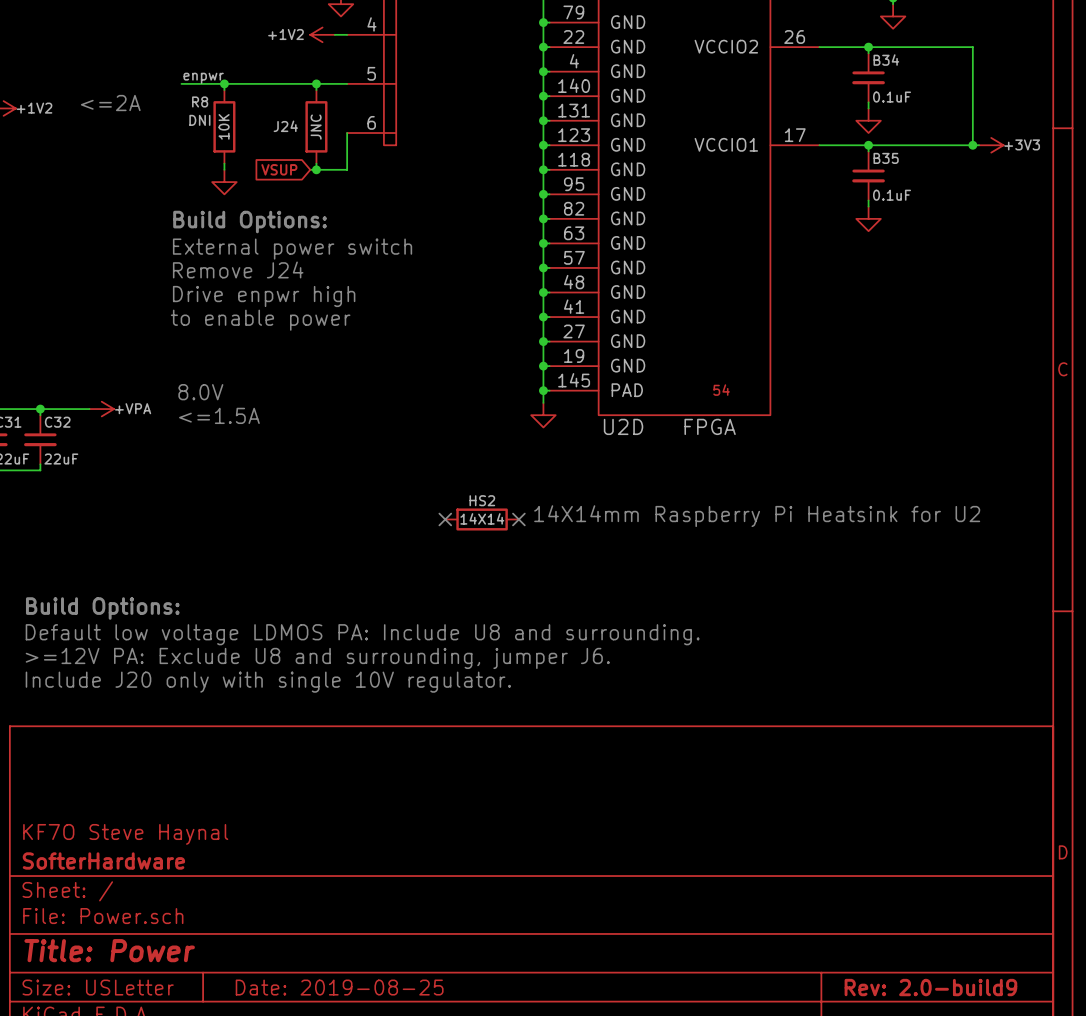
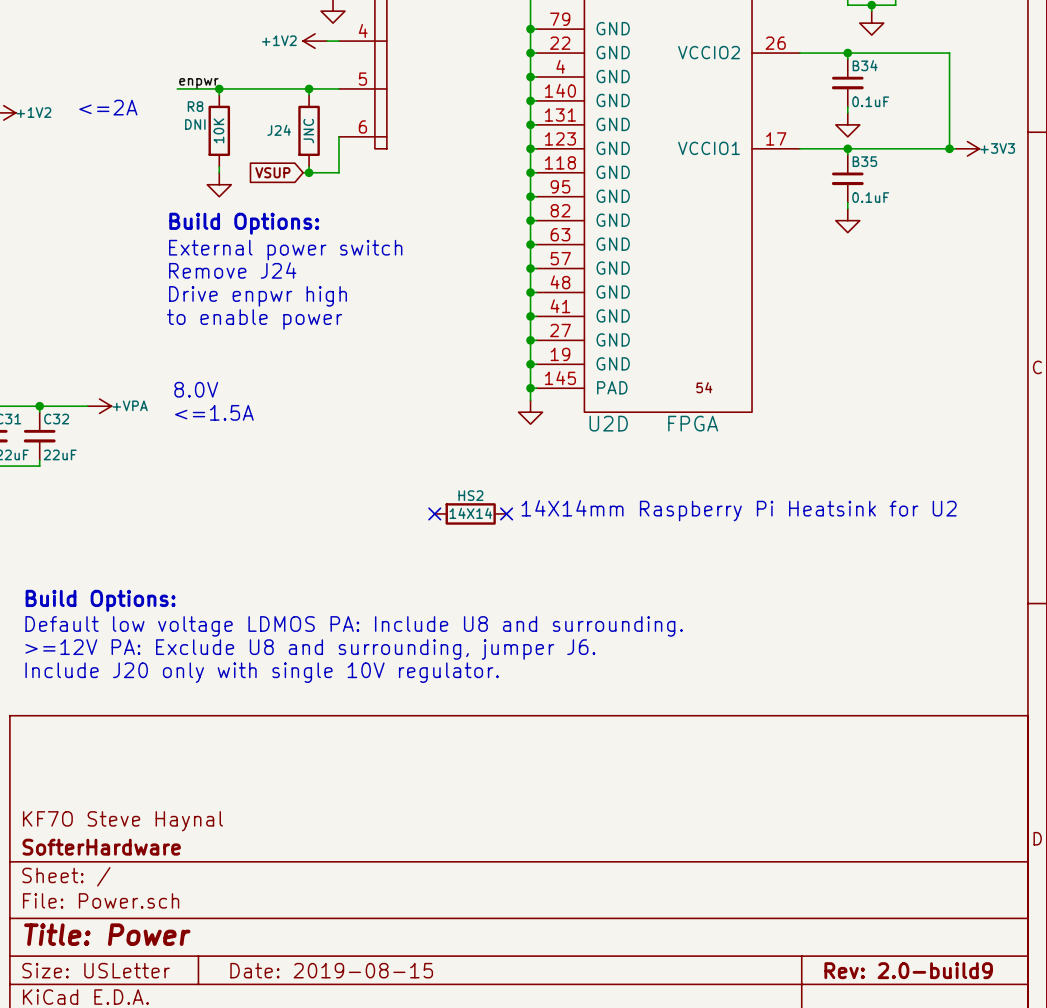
title block: Date: 2019-08-25 (339, 987) -> Date: 2019-08-15 (331, 970)

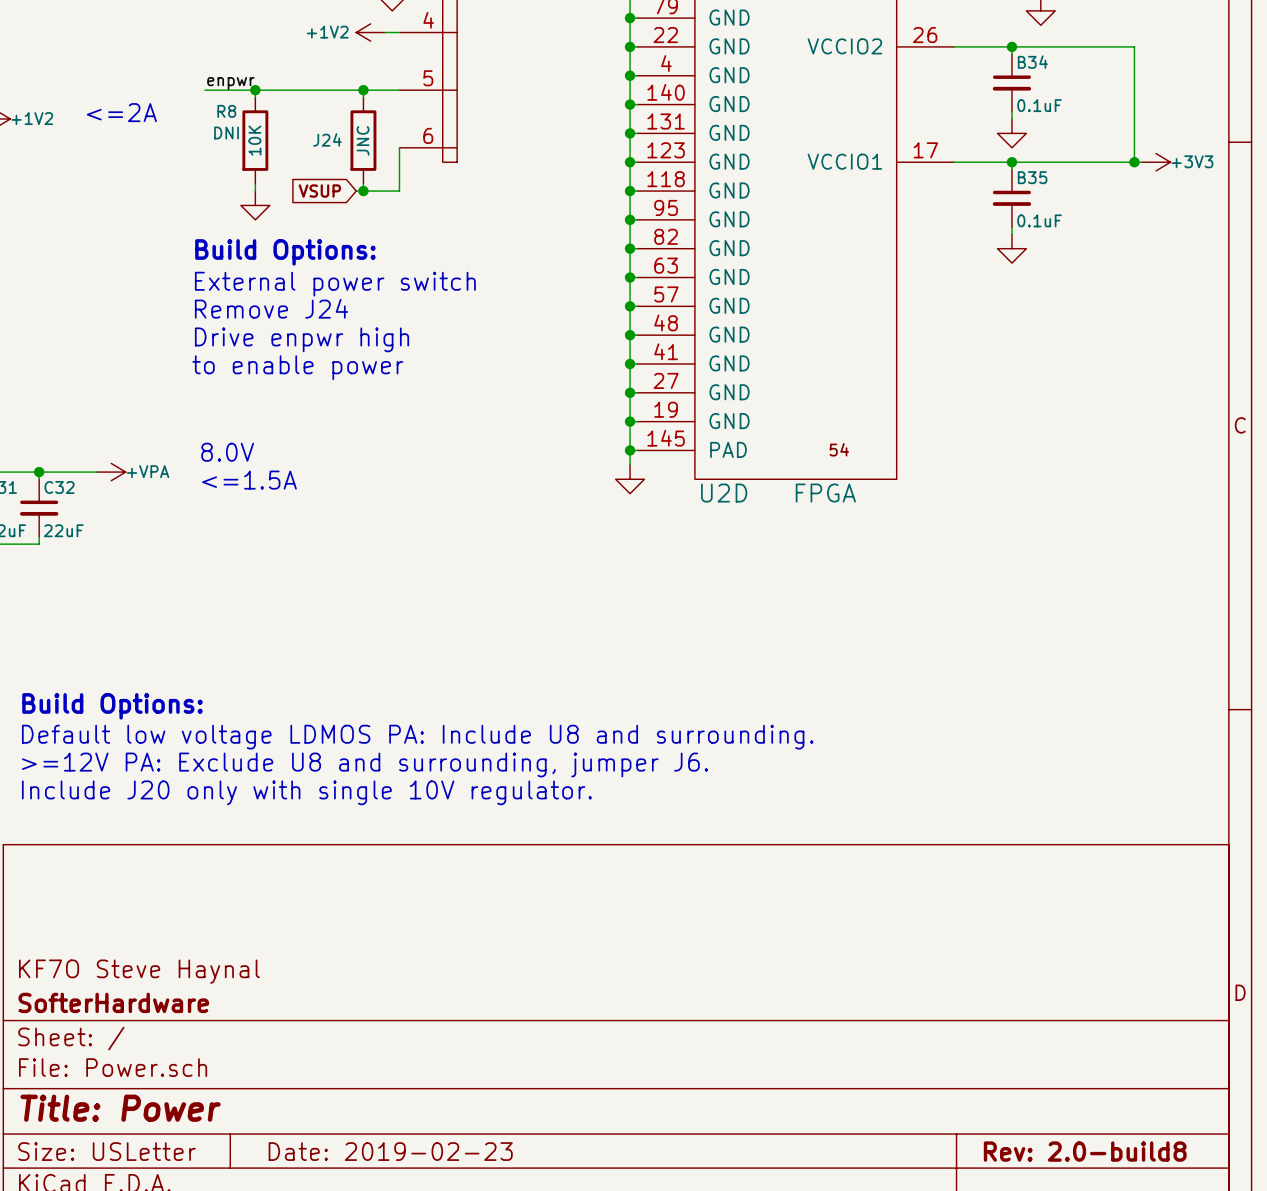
text: 14X14mm Raspberry Pi Heatsink for U2 (739, 510) -> none
no-connect mark: (434, 513) -> none
HS2: 14X14 (470, 513) -> none
no-connect mark: (506, 513) -> none
title block: Date: 2019-08-15 (331, 970) -> Date: 2019-02-23 (390, 1151)
title block: Rev: 2.0-build9 (908, 970) -> Rev: 2.0-build8 (1085, 1151)

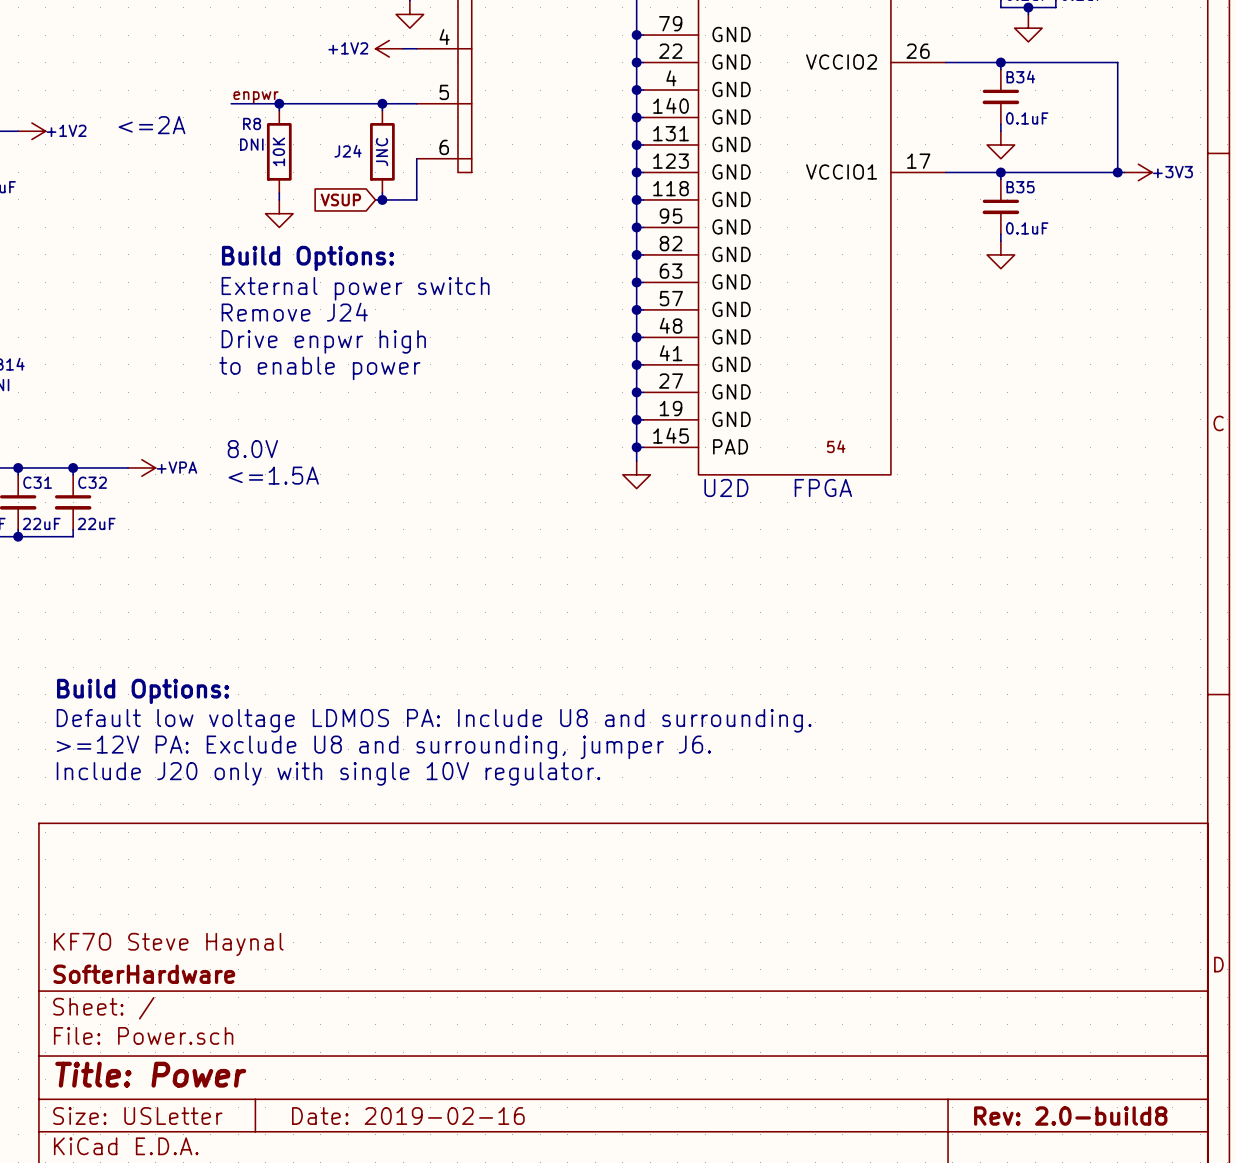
title block: Date: 2019-02-23 (390, 1151) -> Date: 2019-02-16 (408, 1116)

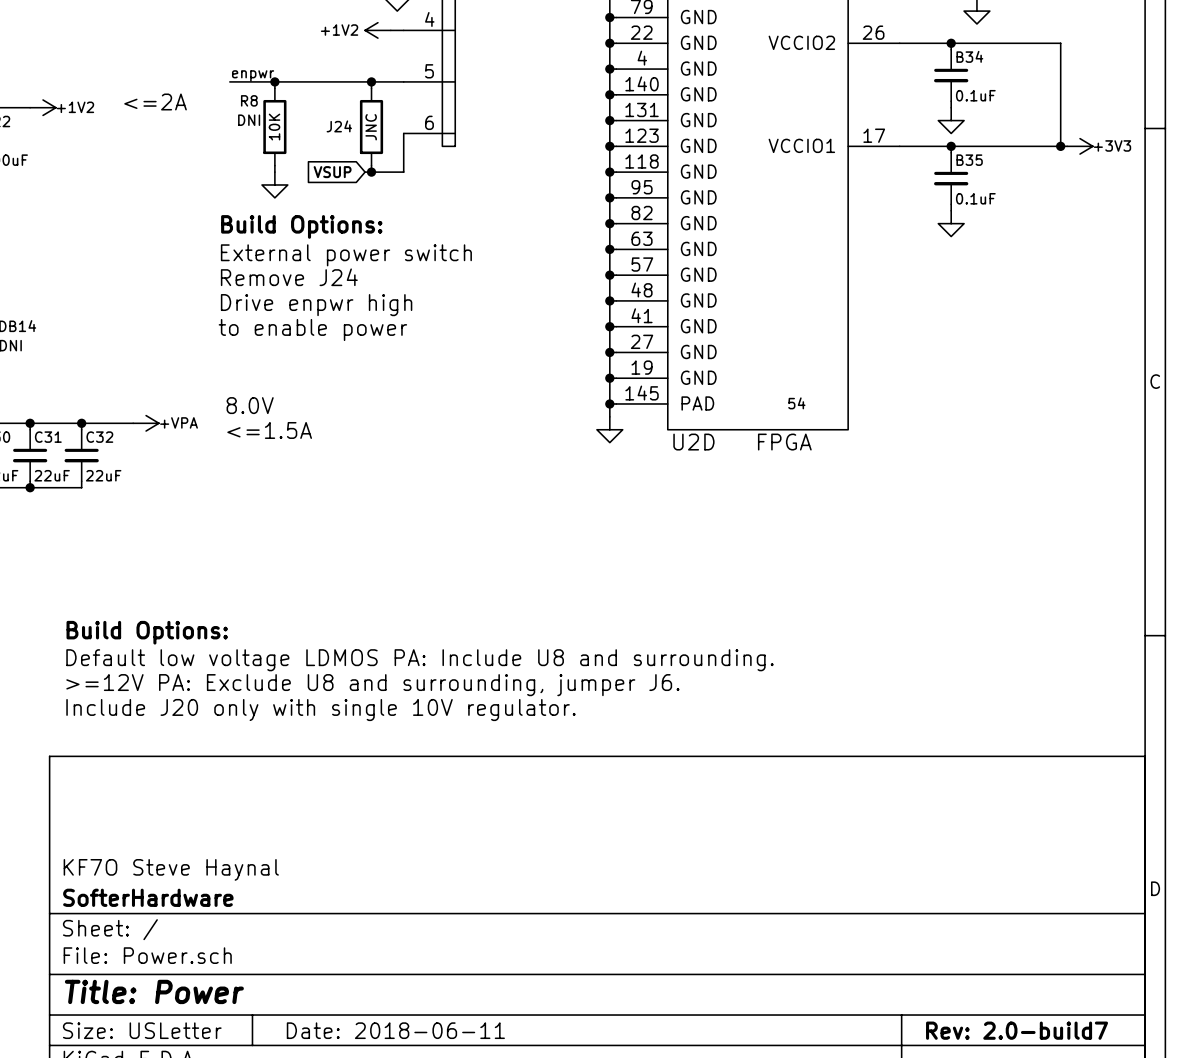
title block: Date: 2019-02-16 (408, 1116) -> Date: 2018-06-11 (395, 1030)
title block: Rev: 2.0-build8 (1070, 1116) -> Rev: 2.0-build7 (1017, 1030)

